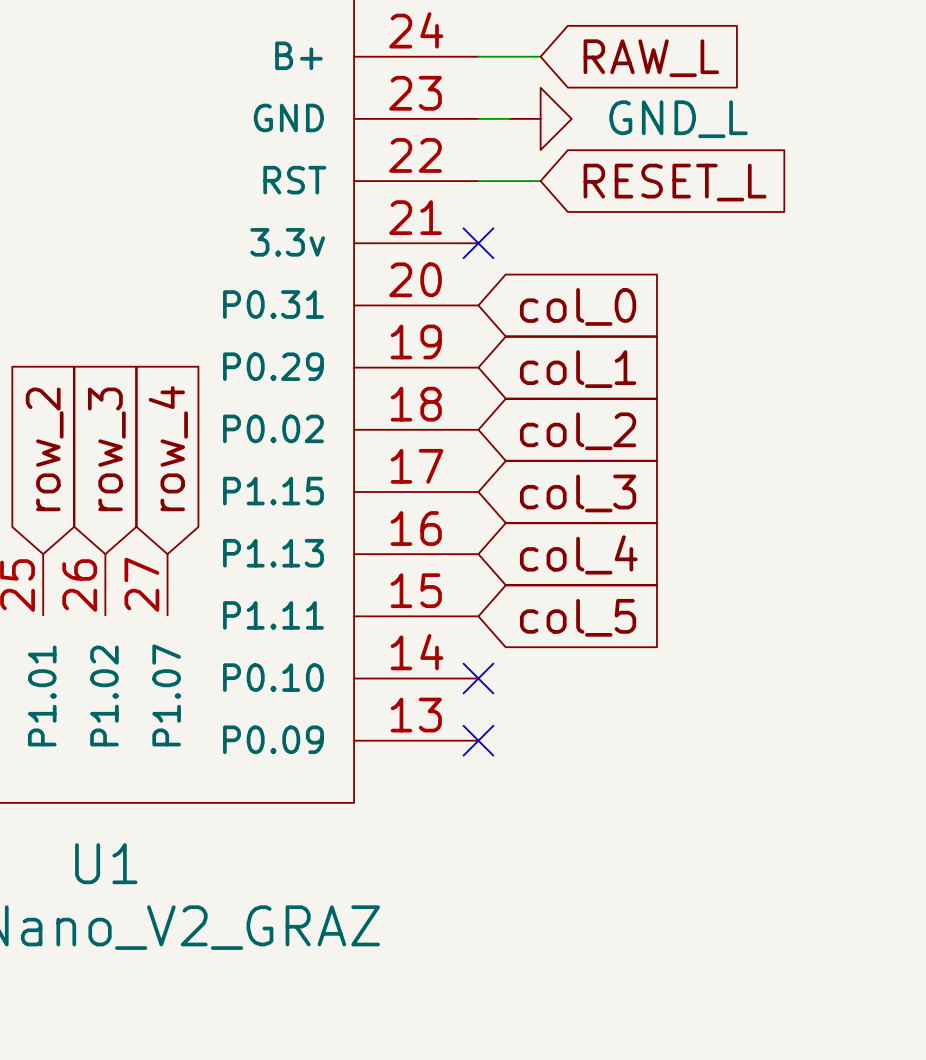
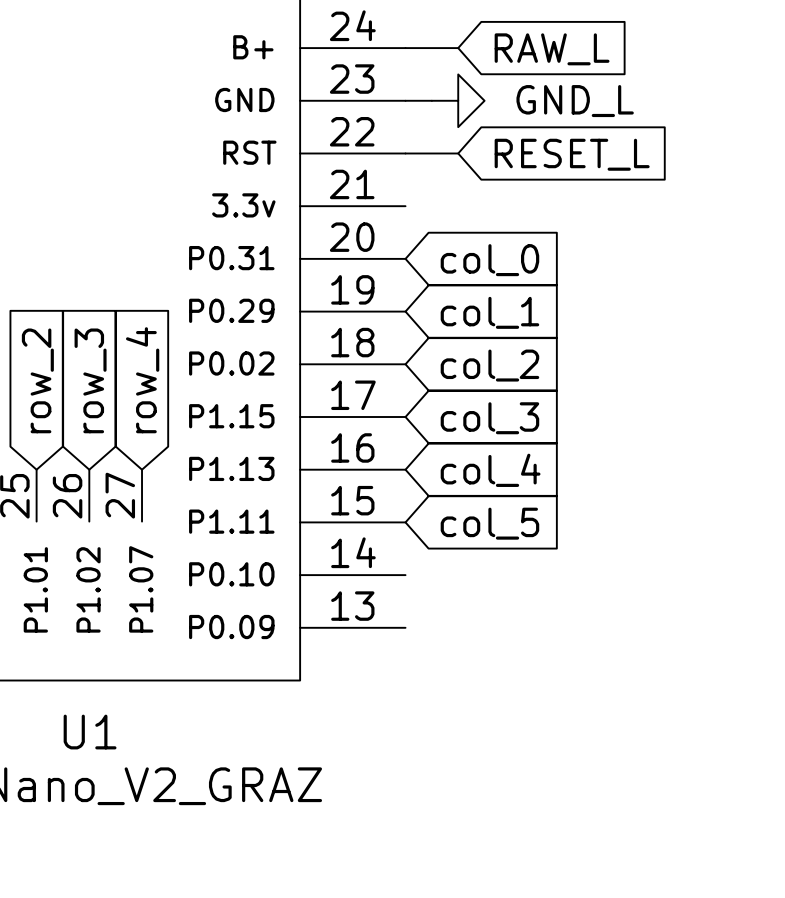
no-connect mark: (478, 243) -> none
no-connect mark: (478, 678) -> none
no-connect mark: (478, 740) -> none

